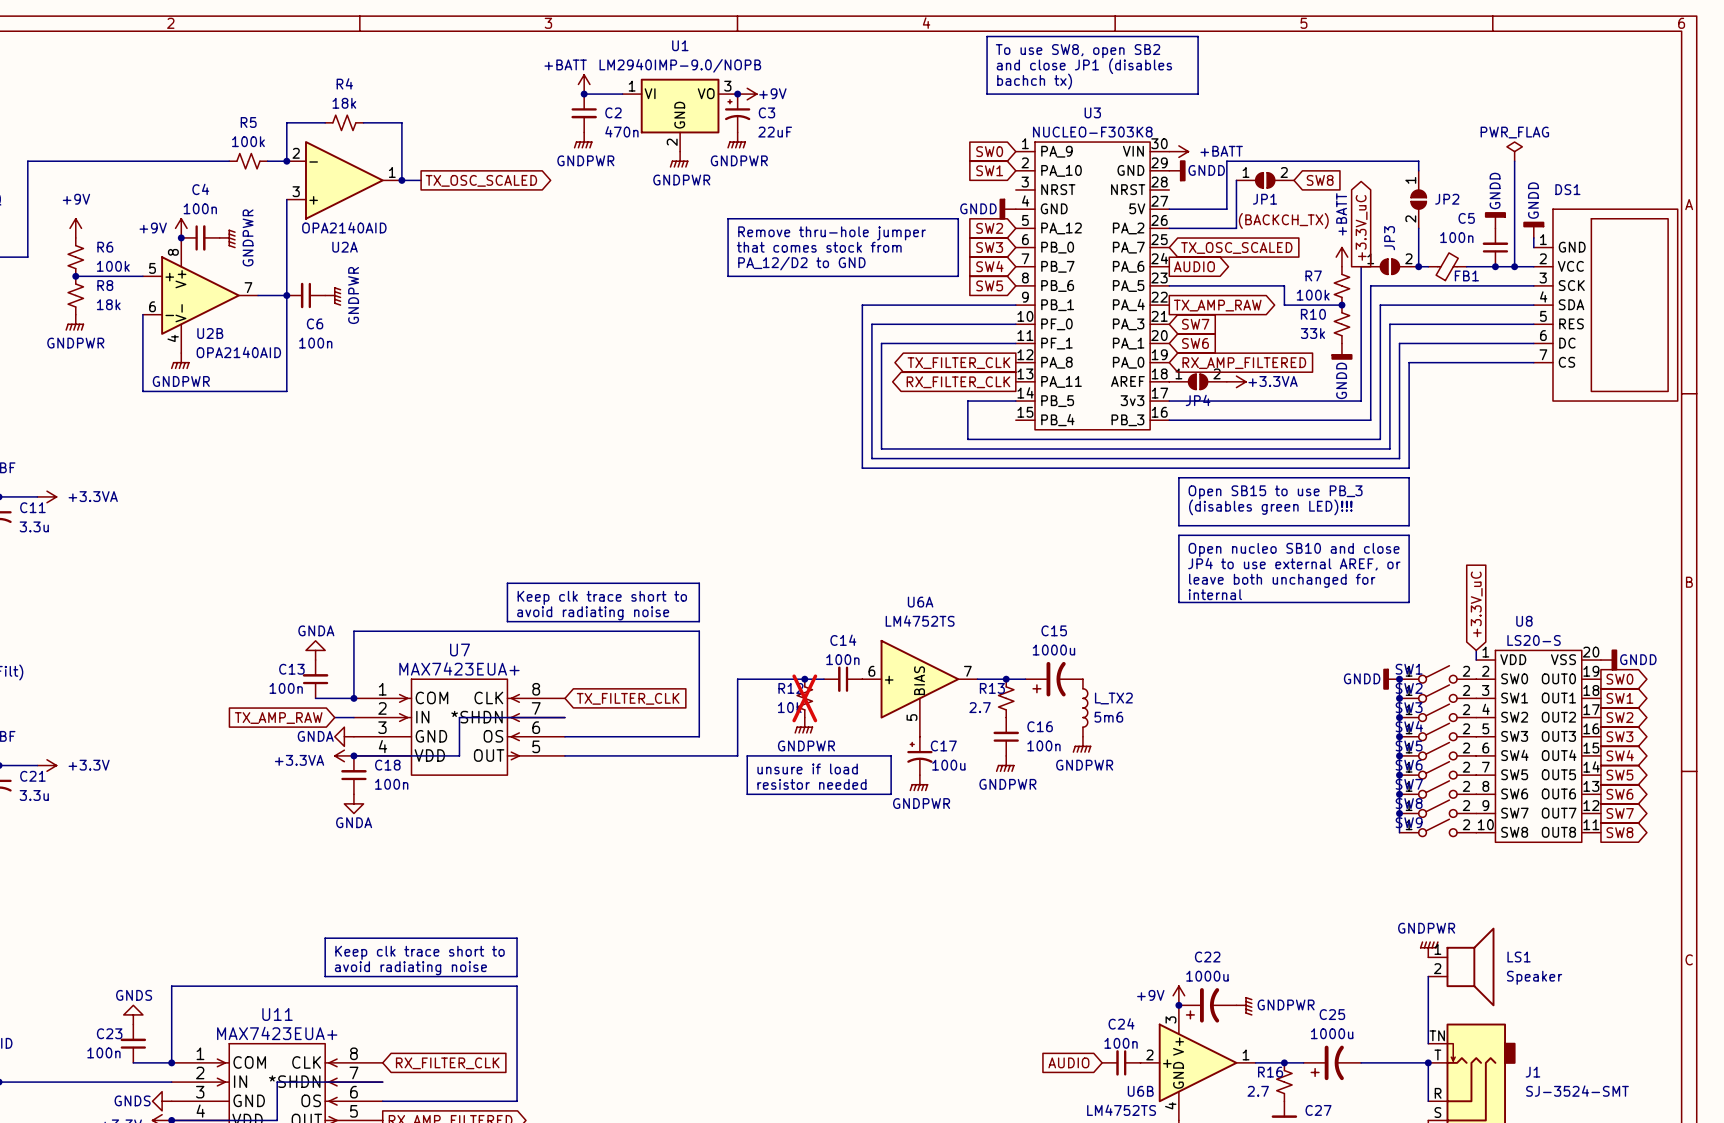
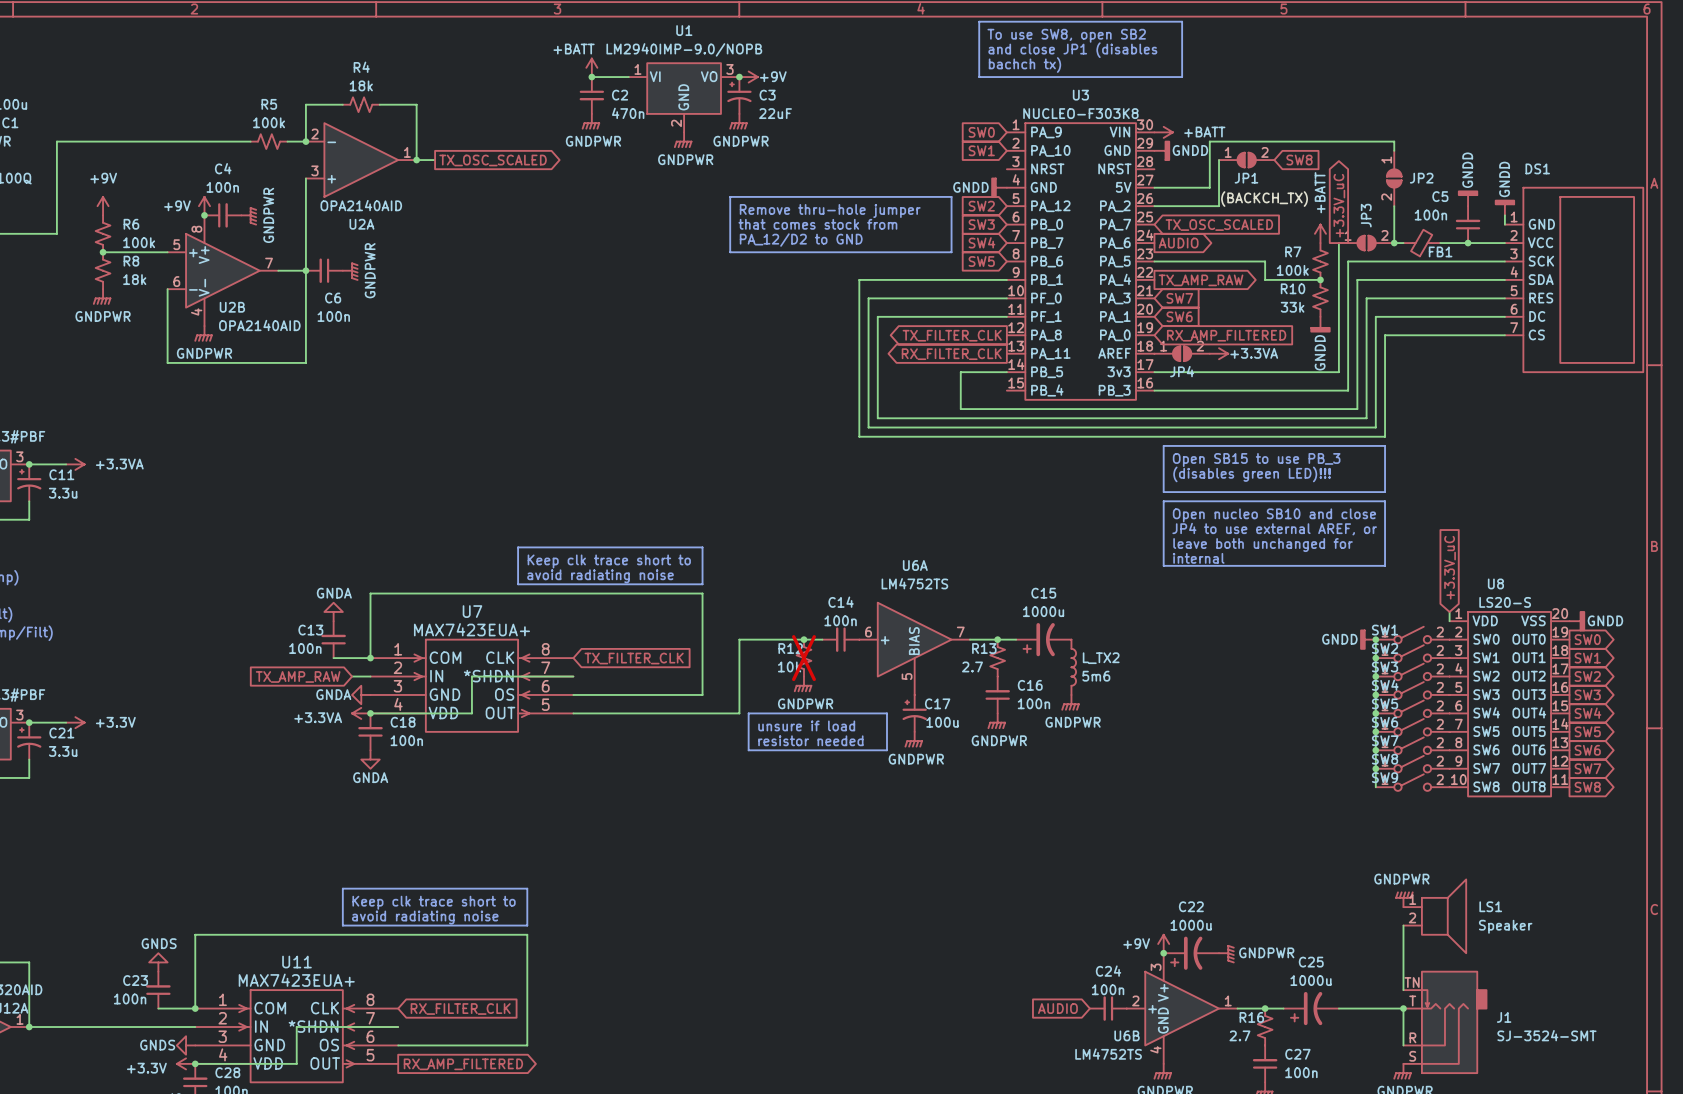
power symbol: PWR_FLAG (1514, 151) -> none
wire: (1514, 161) (1514, 266) -> none
junction: (1514, 266) -> none

